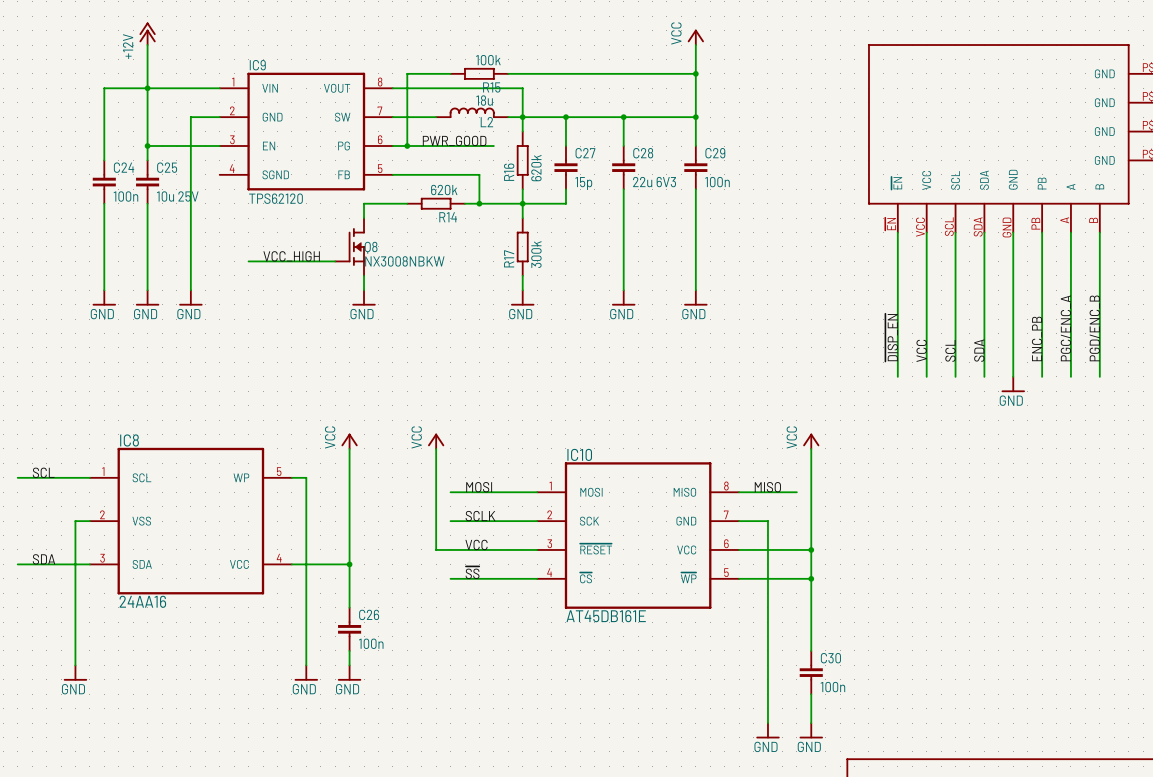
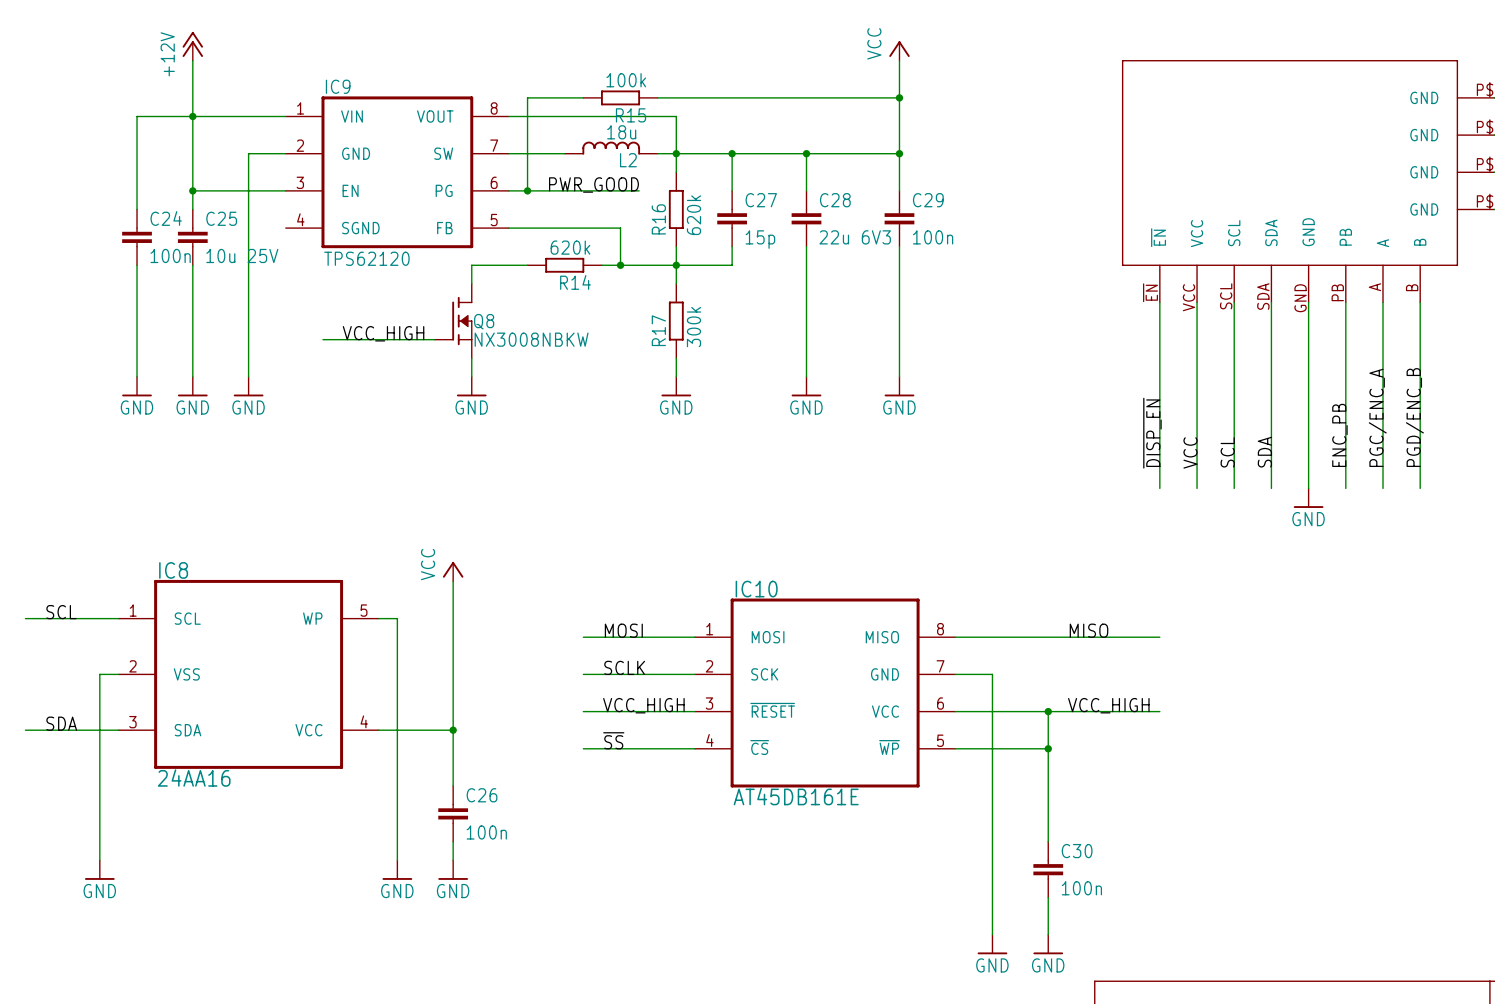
power symbol: VCC (436, 441) -> none
power symbol: VCC (811, 441) -> none
wire: (436, 448) (436, 549) (450, 549) -> none
wire: (811, 448) (811, 549) -> (1159, 711) (1048, 711)
label position: MISO (767, 487) -> MISO (1089, 630)
wire: none -> (1029, 637) (1159, 637)
label: VCC (476, 544) -> VCC_HIGH (643, 705)
label: none -> VCC_HIGH (1108, 705)

